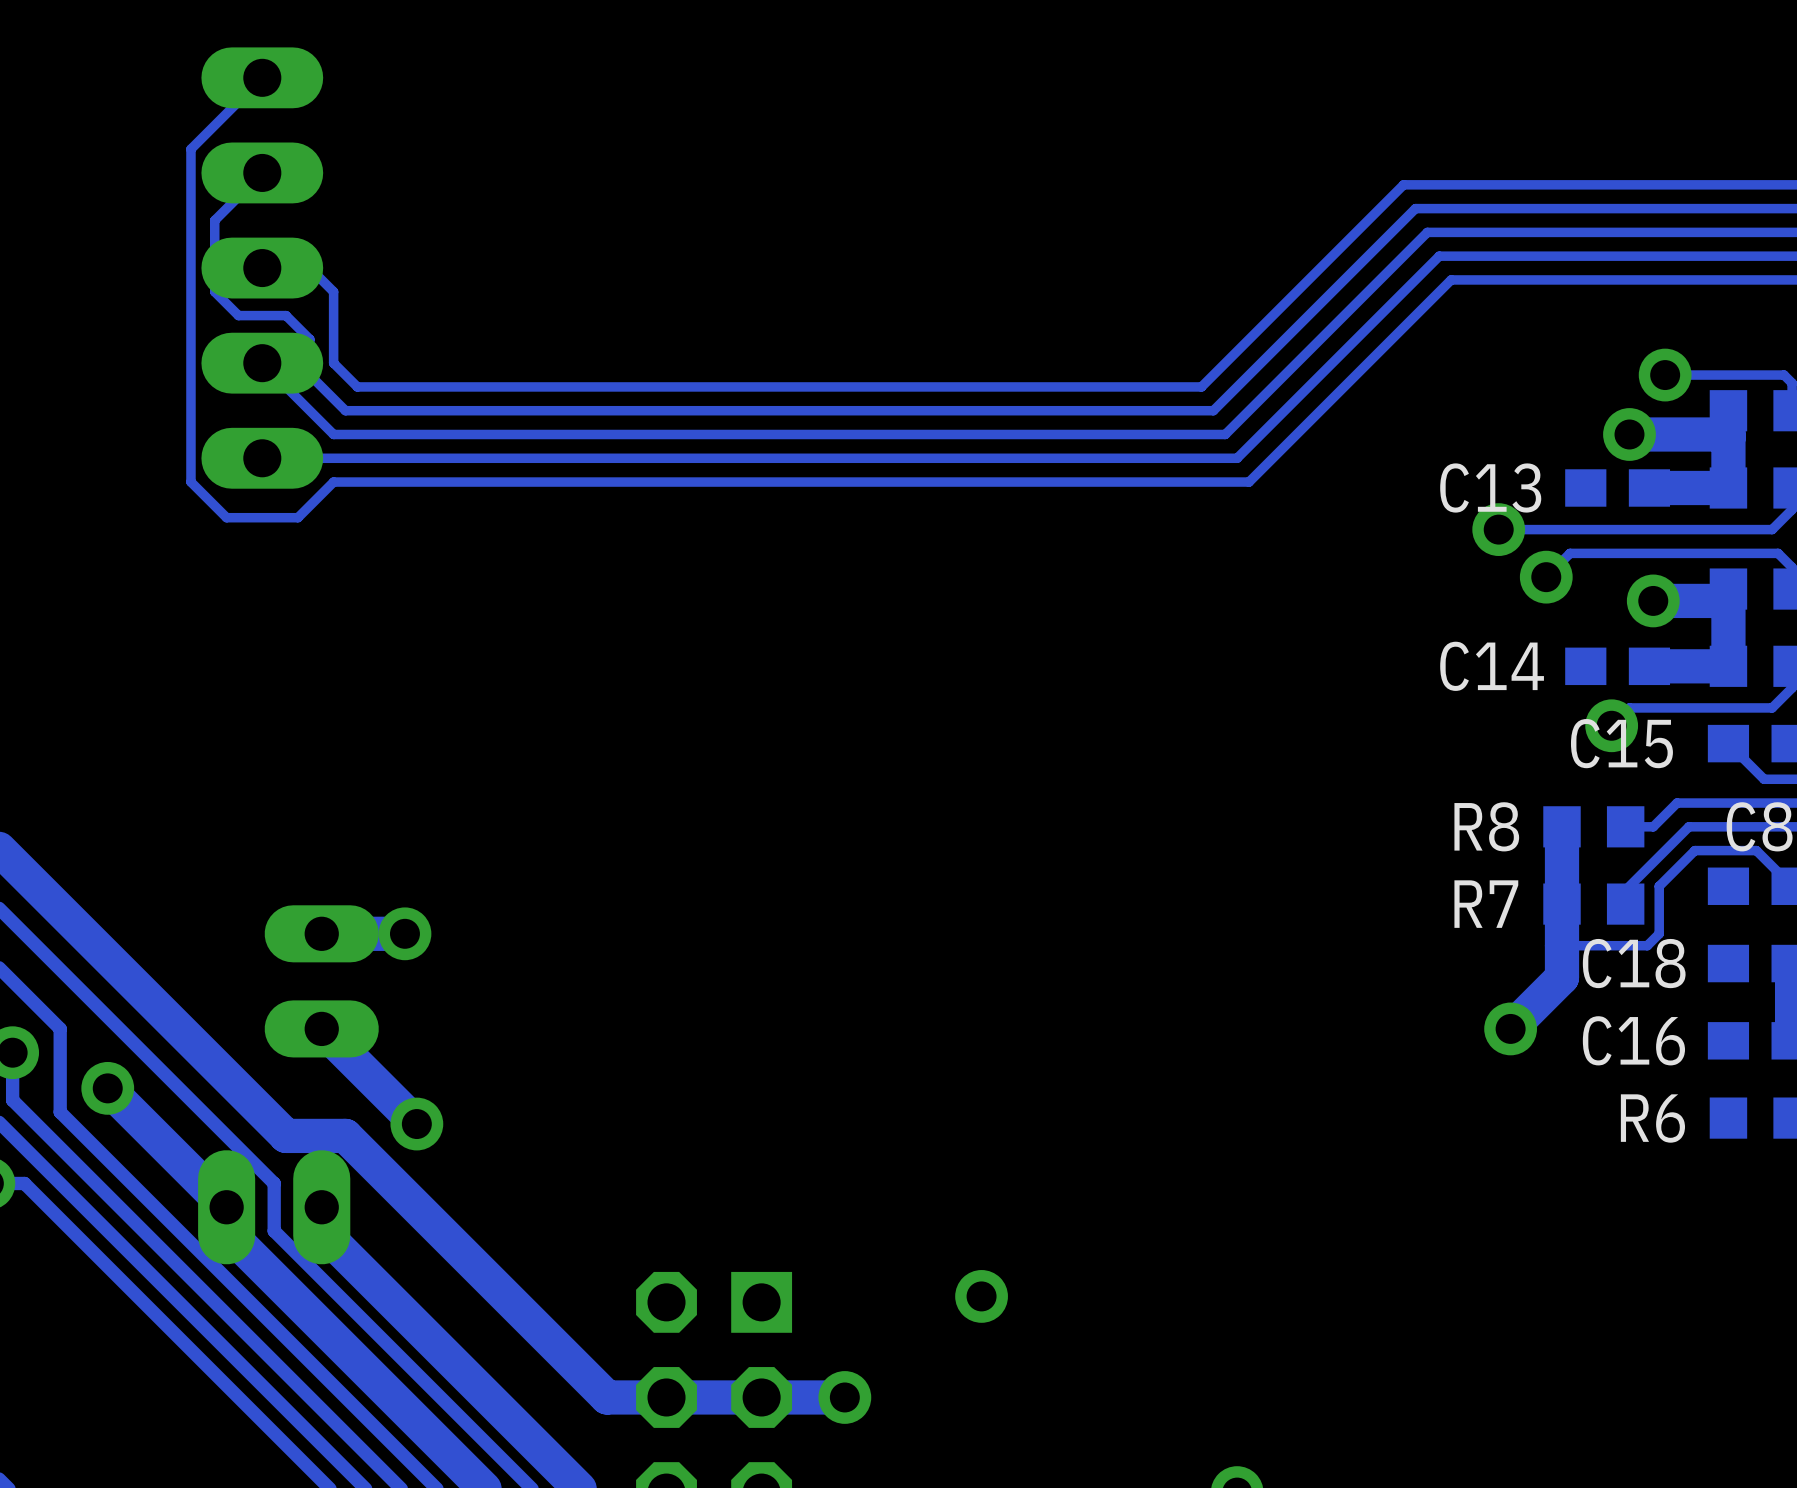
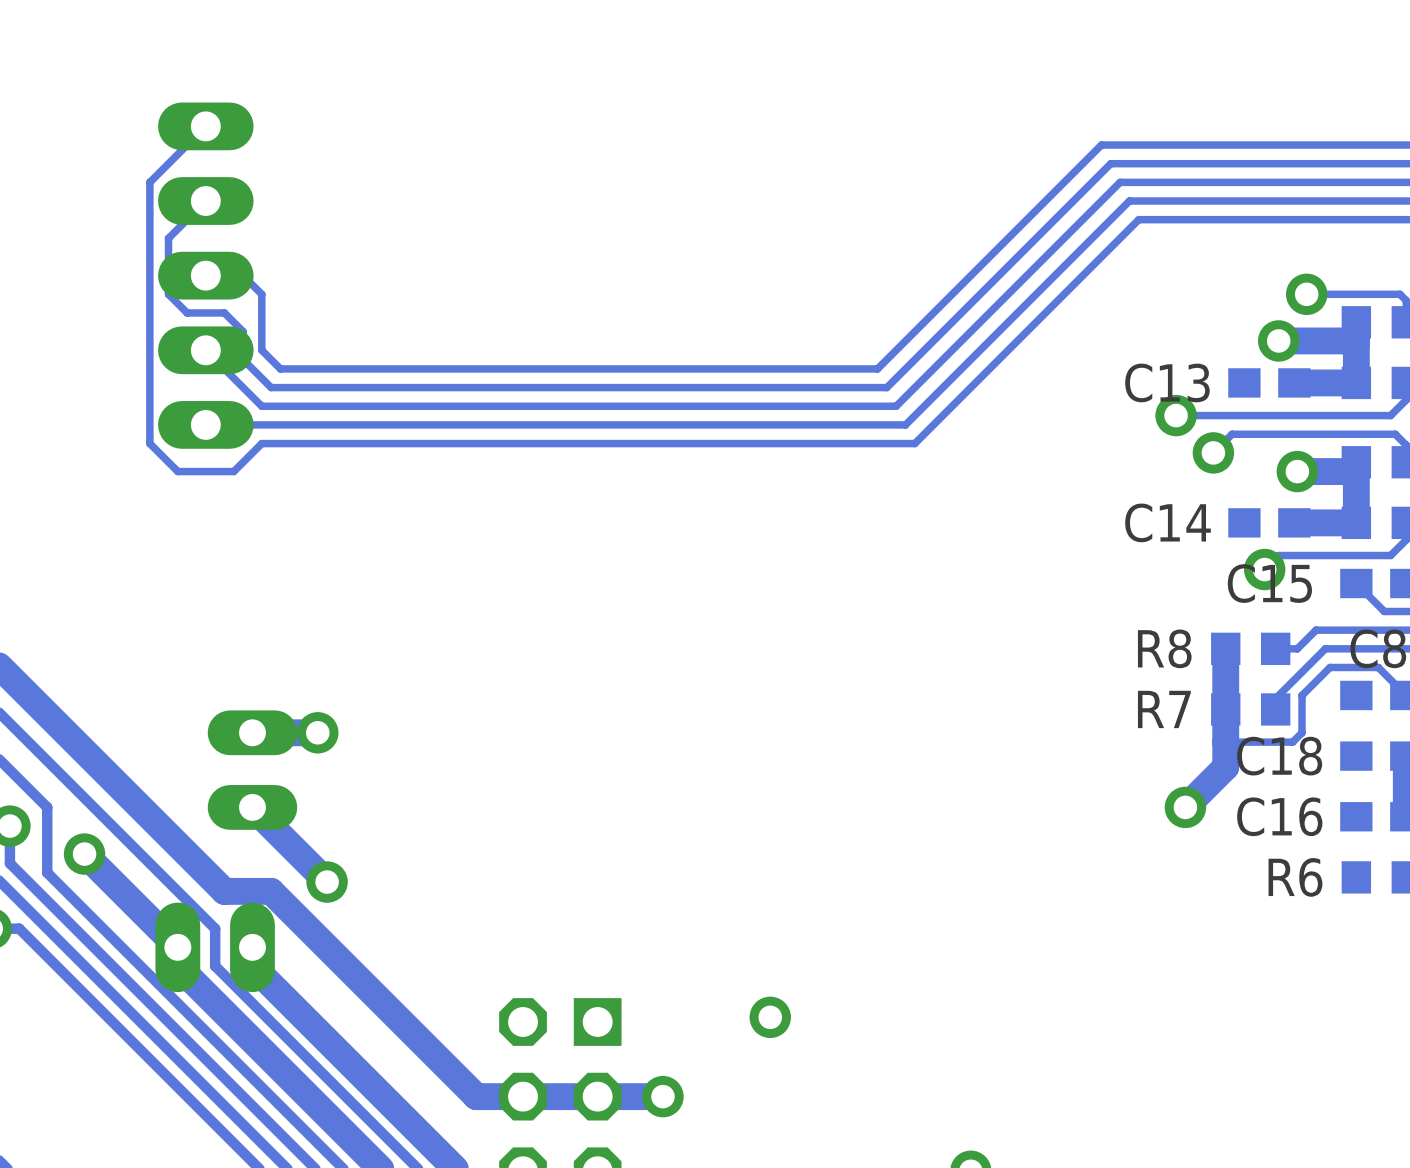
track: (262, 77) (190, 149) (190, 232) -> (205, 126) (149, 182)
track: (262, 172) (214, 220) (214, 291) (238, 315) (286, 315) (309, 339) (309, 375) (345, 410) (1213, 410) -> (205, 201) (168, 238) (168, 294) (187, 312) (224, 312) (243, 331) (243, 359) (271, 387) (886, 387) (952, 322)
track: (262, 268) (309, 268) (333, 291) (333, 363) (357, 386) (1201, 386) -> (205, 275) (243, 275) (261, 294) (261, 350) (280, 368) (877, 368) (942, 303)
part position: (262, 268) -> (205, 275)
track: (262, 363) (333, 434) (1225, 434) -> (205, 350) (261, 406) (896, 406) (961, 340)
track: (1237, 458) (262, 458) -> (970, 359) (905, 424) (205, 424)
track: (1249, 482) (333, 482) (297, 517) (226, 517) (190, 482) -> (980, 378) (914, 443) (261, 443) (233, 471) (177, 471) (149, 443) (149, 378)

